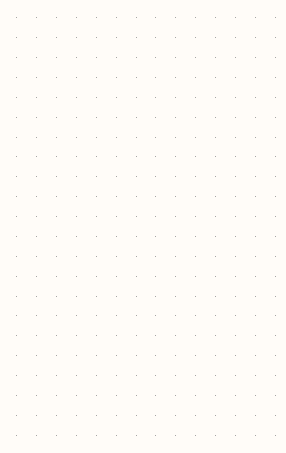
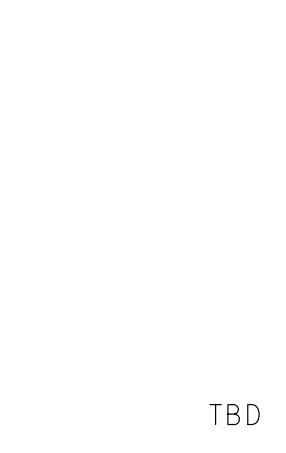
text: none -> TBD (234, 414)

